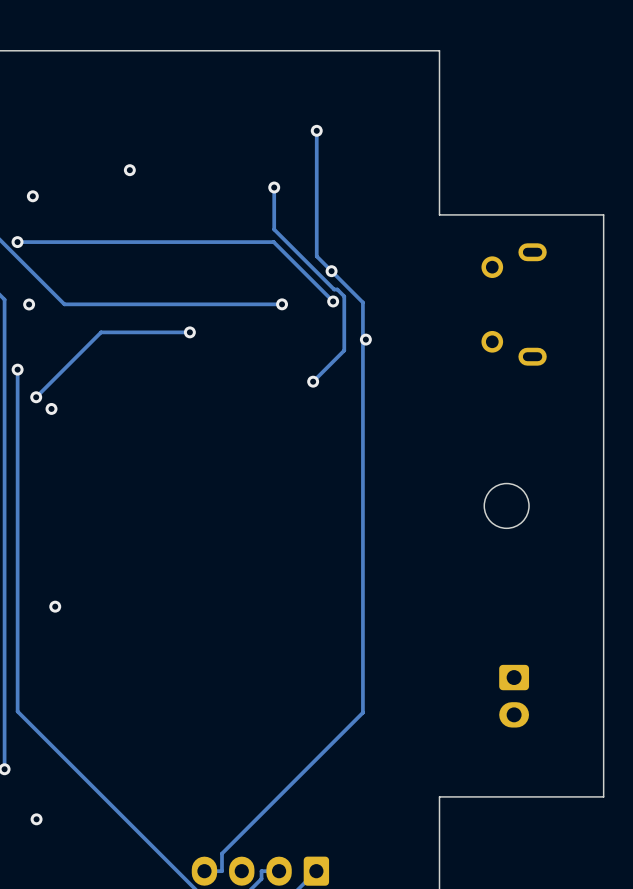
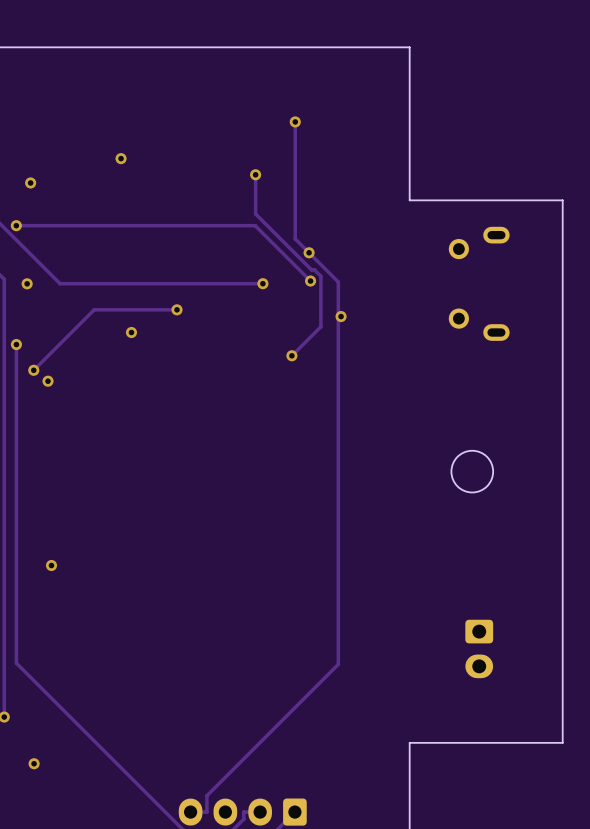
via: none -> (131, 332)

